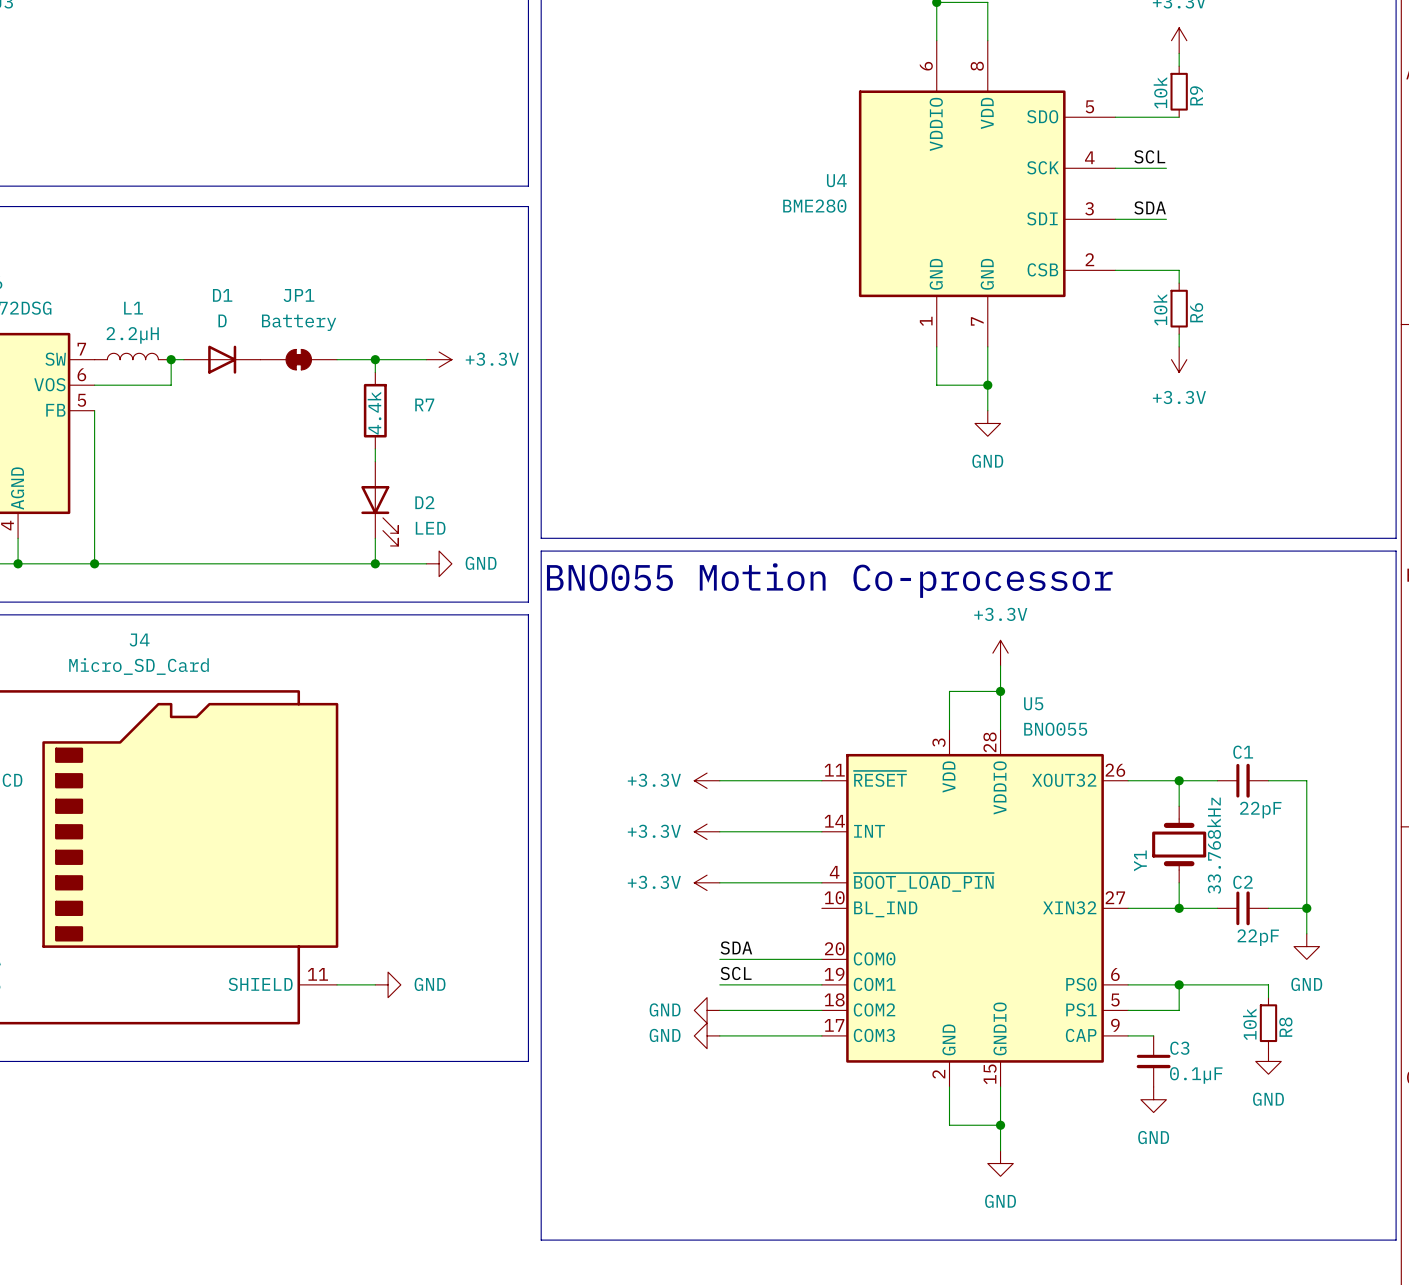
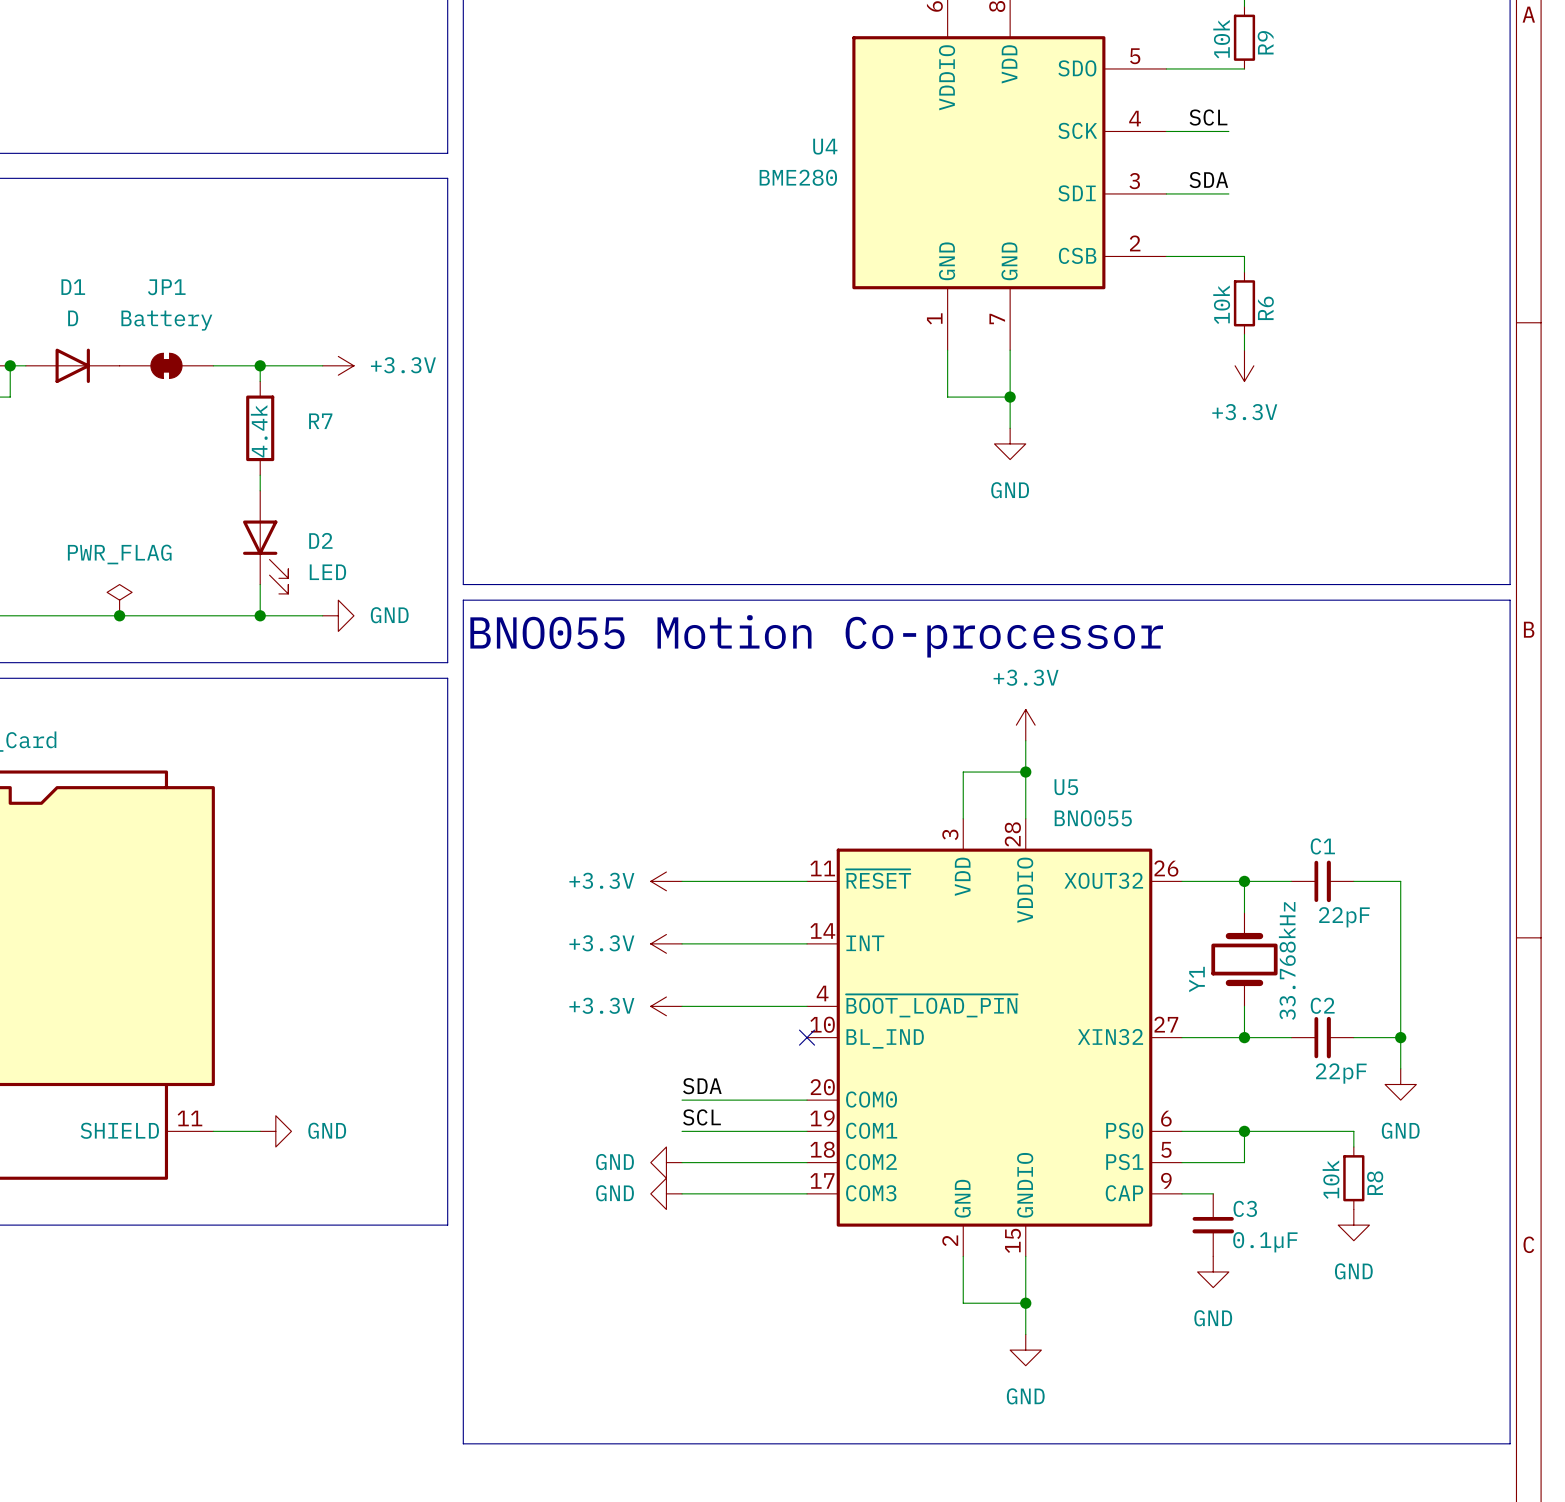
power symbol: none -> PWR_FLAG (119, 600)
junction: none -> (119, 615)
no-connect mark: none -> (807, 1037)

